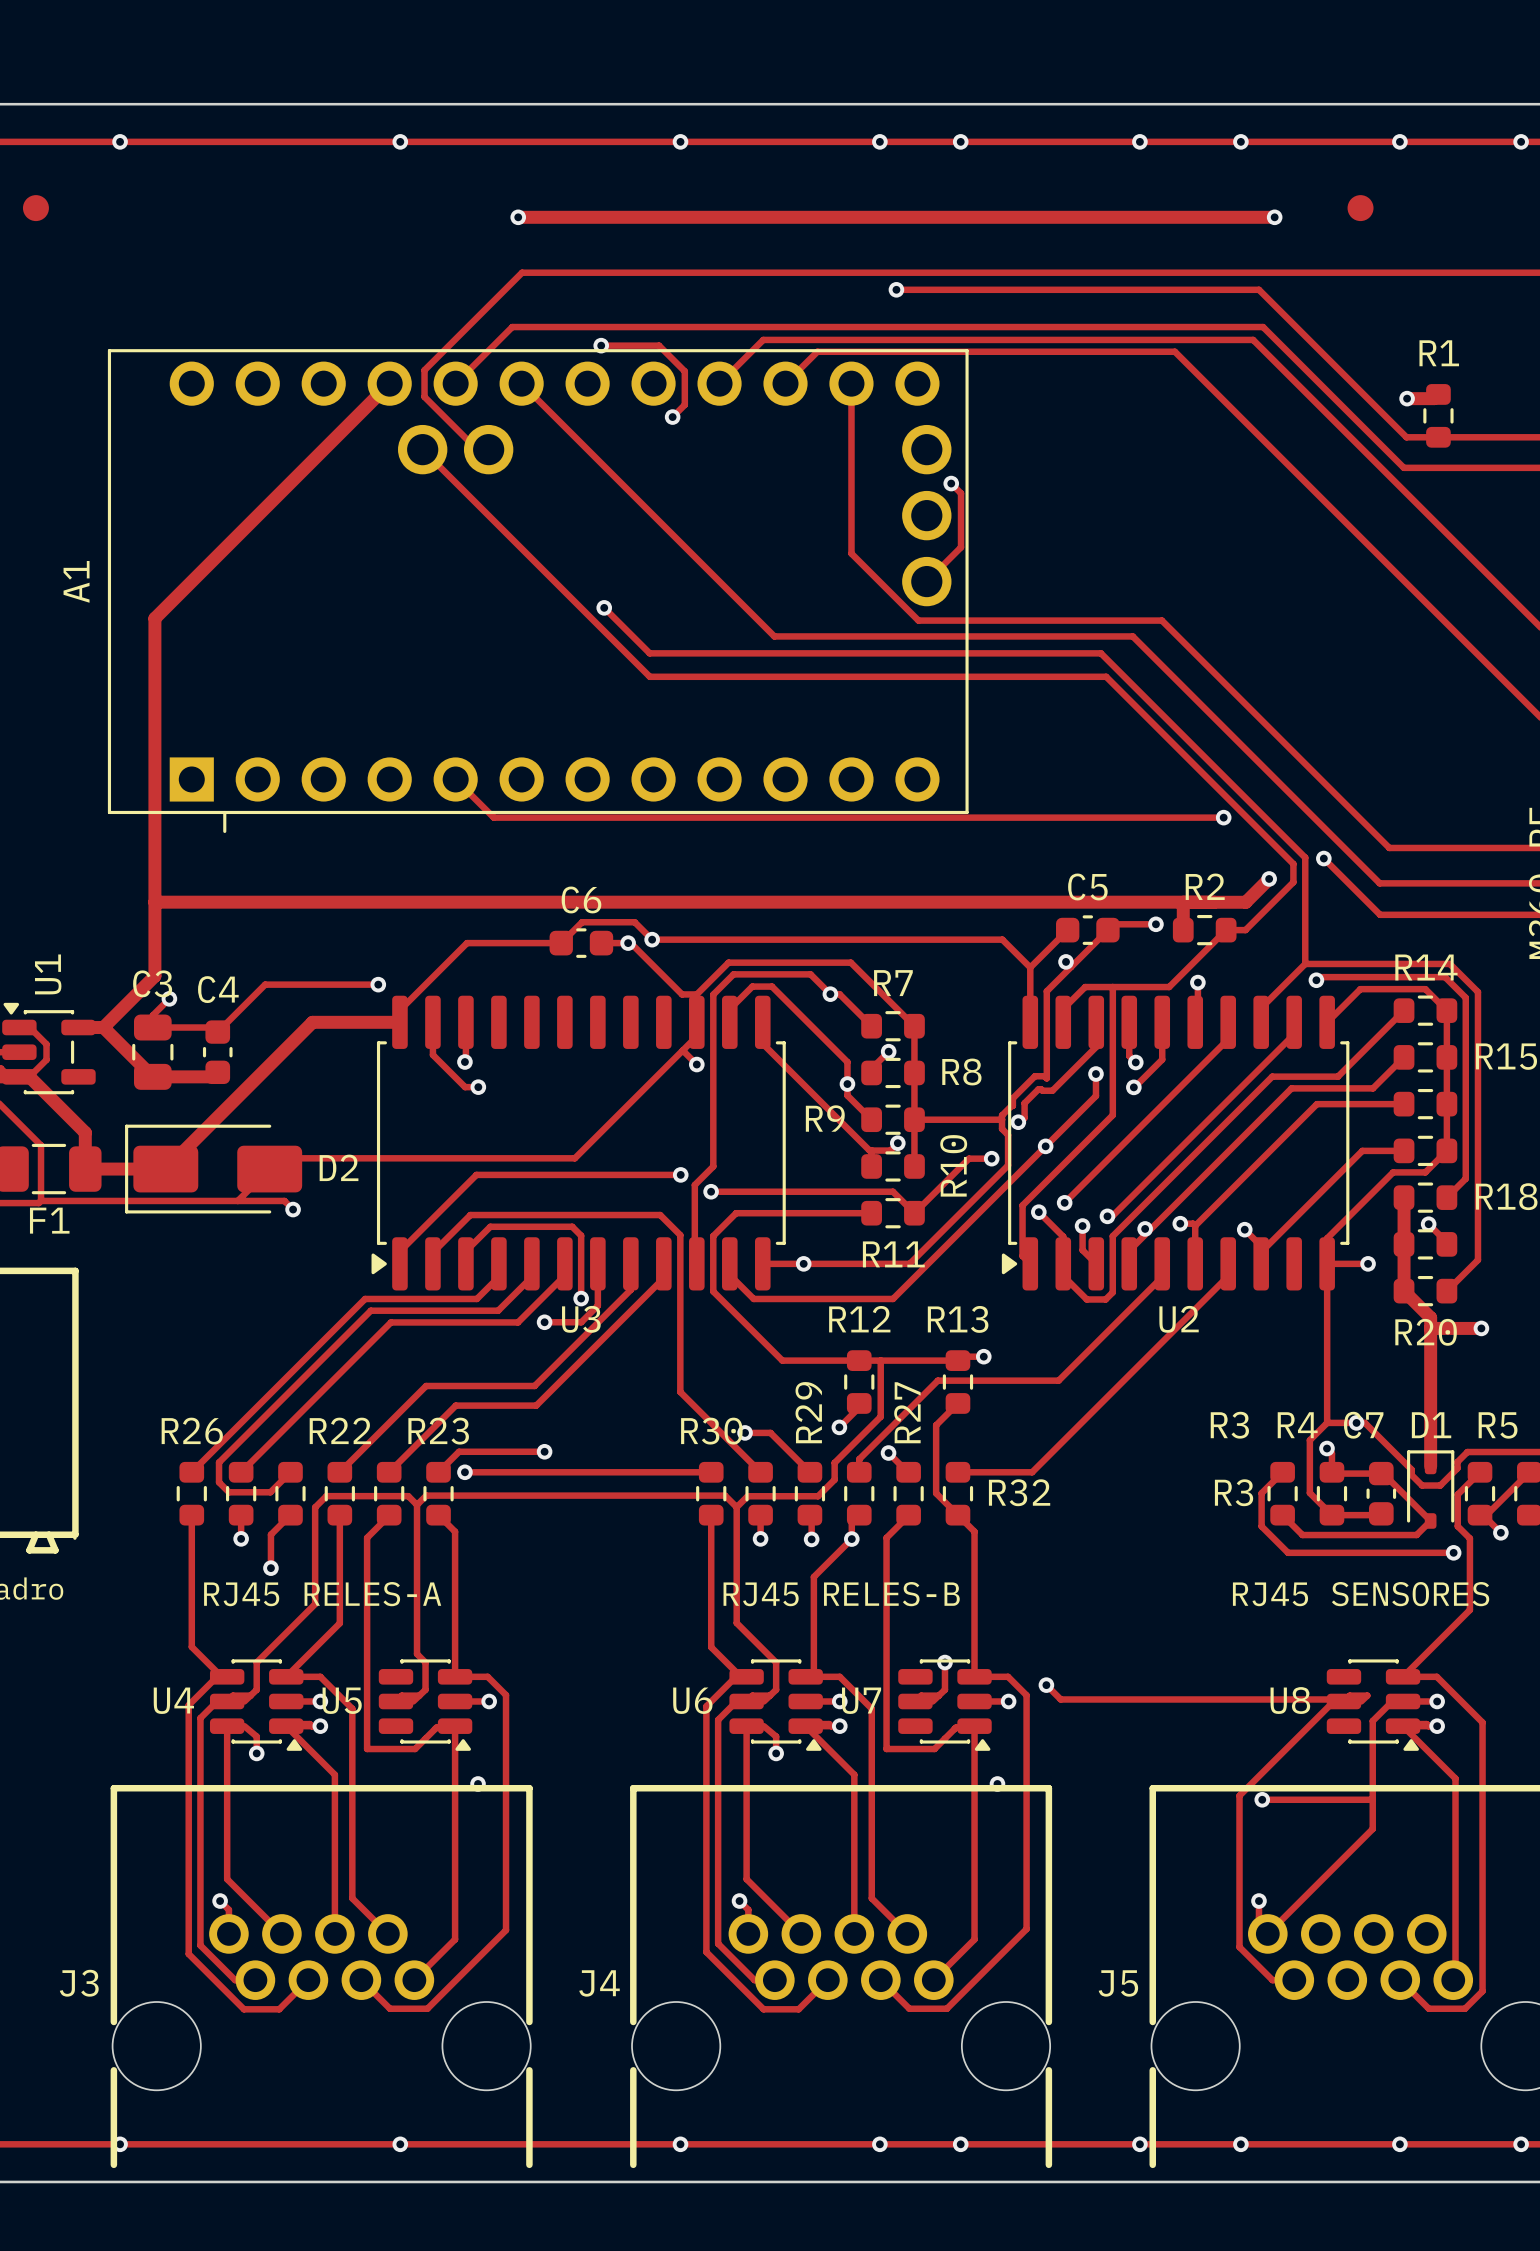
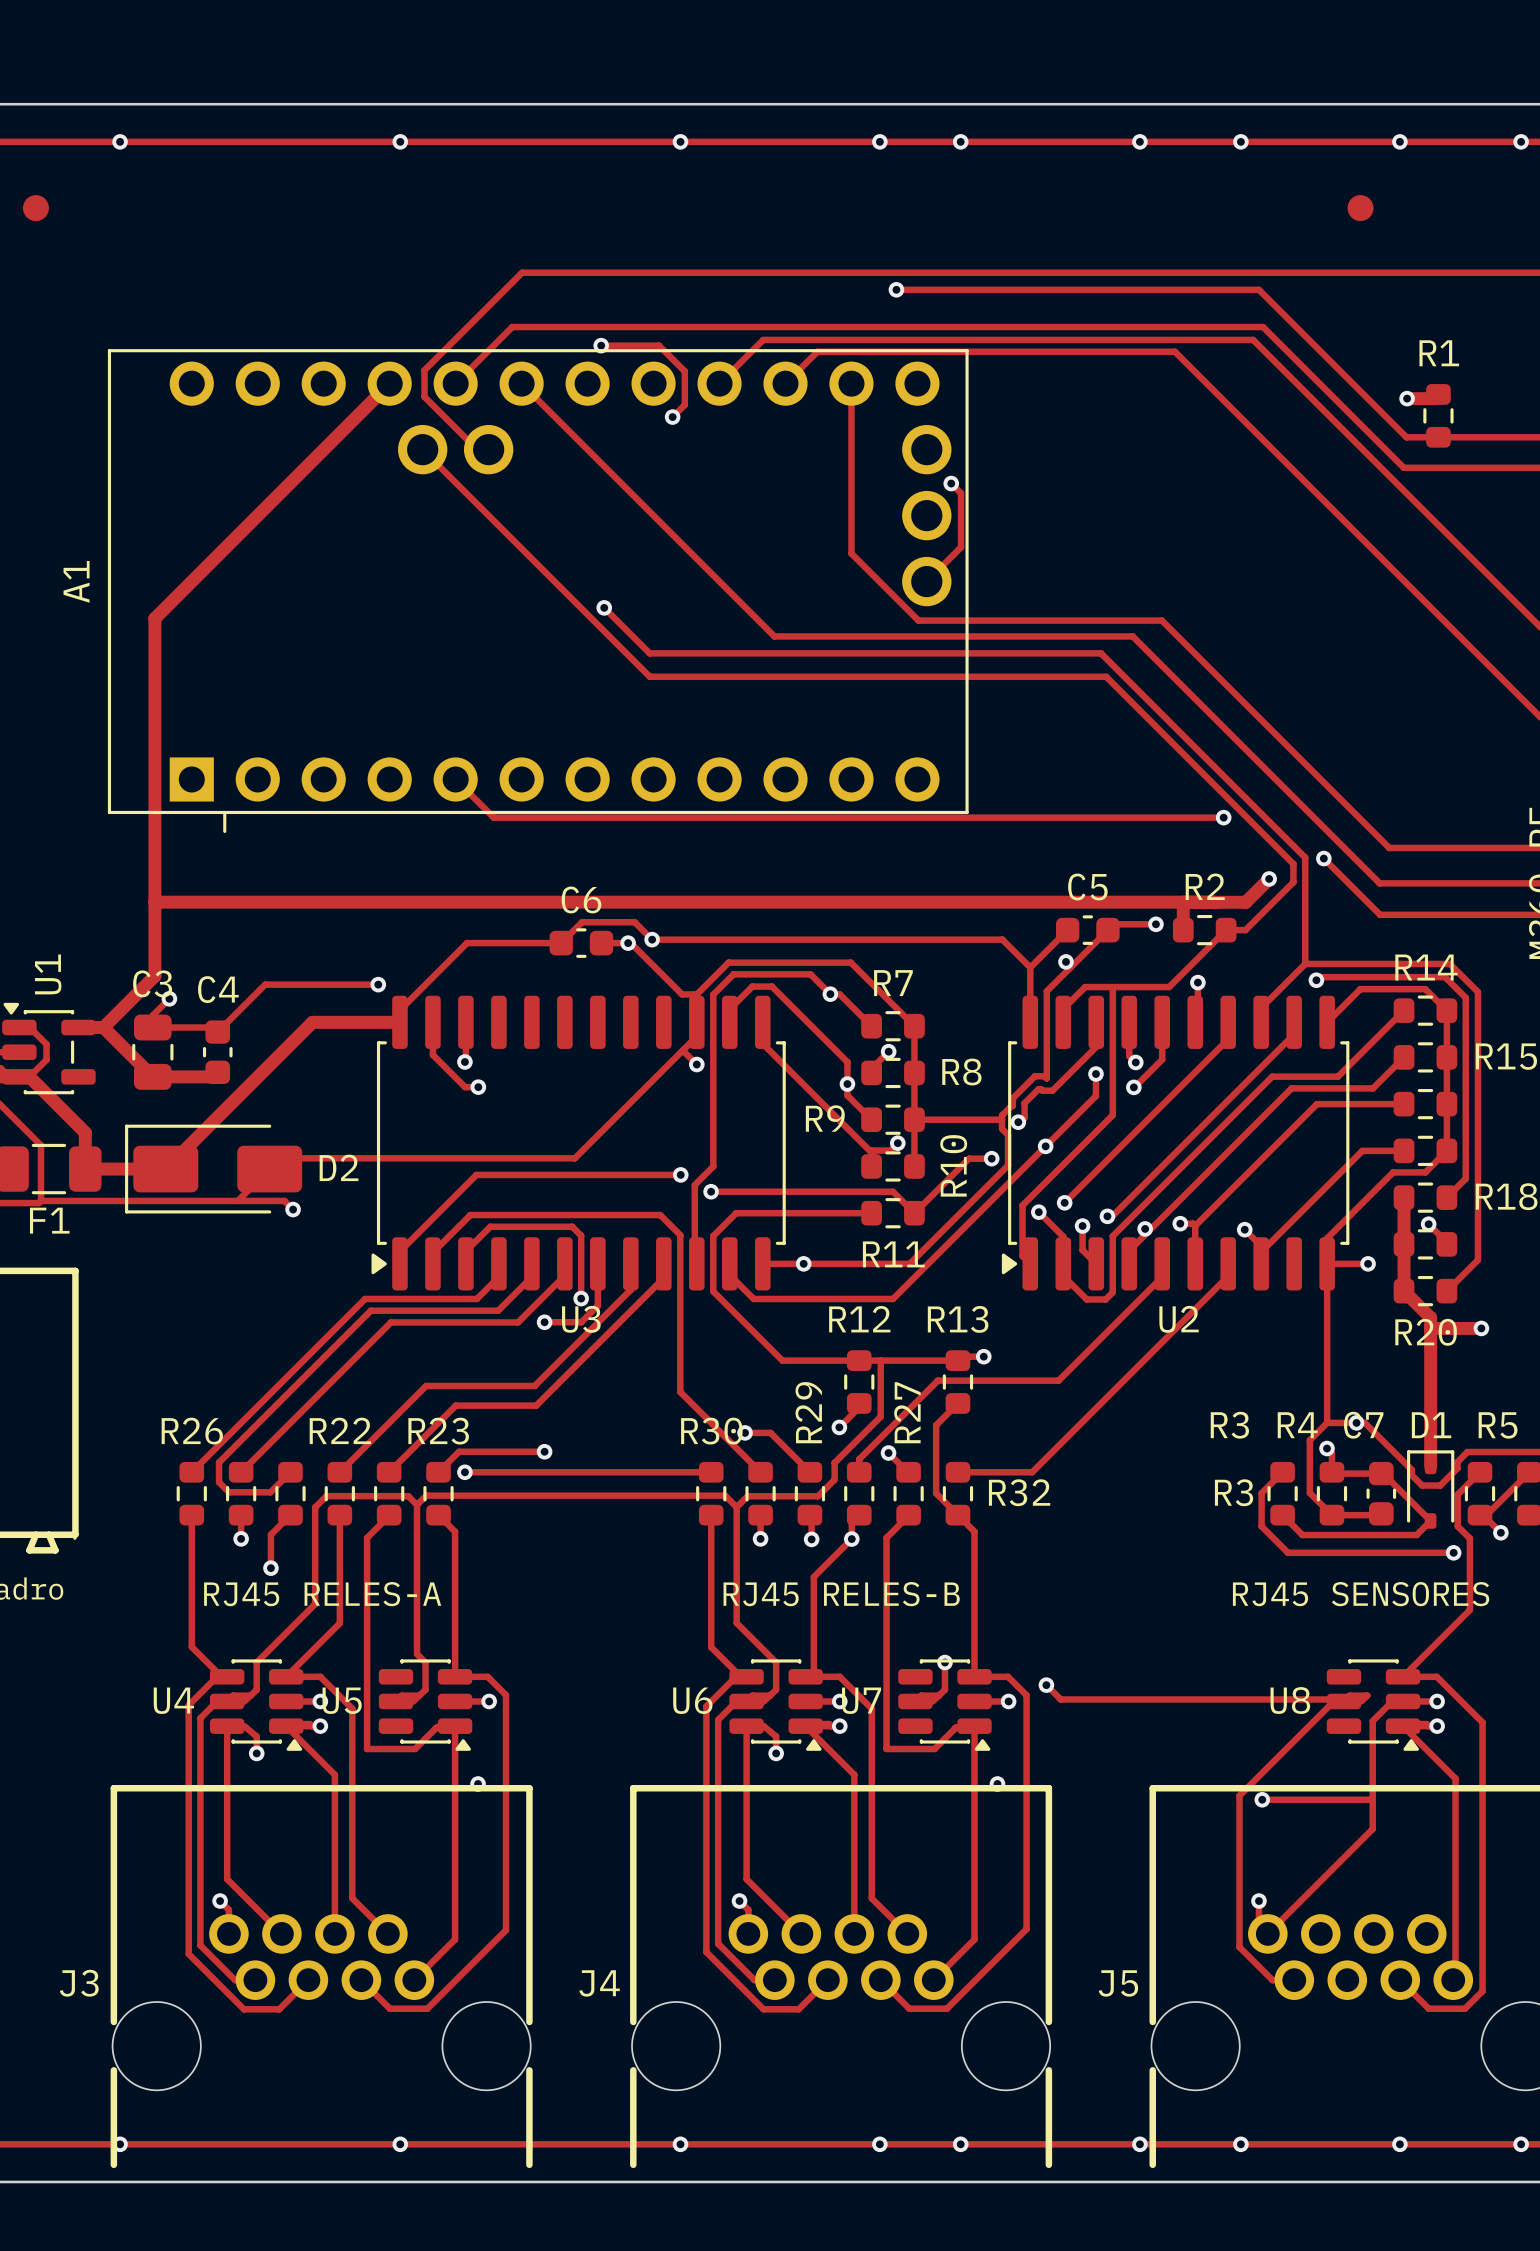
track: (518, 217) (1274, 217) -> none
via: (518, 217) -> none
via: (1274, 217) -> none

